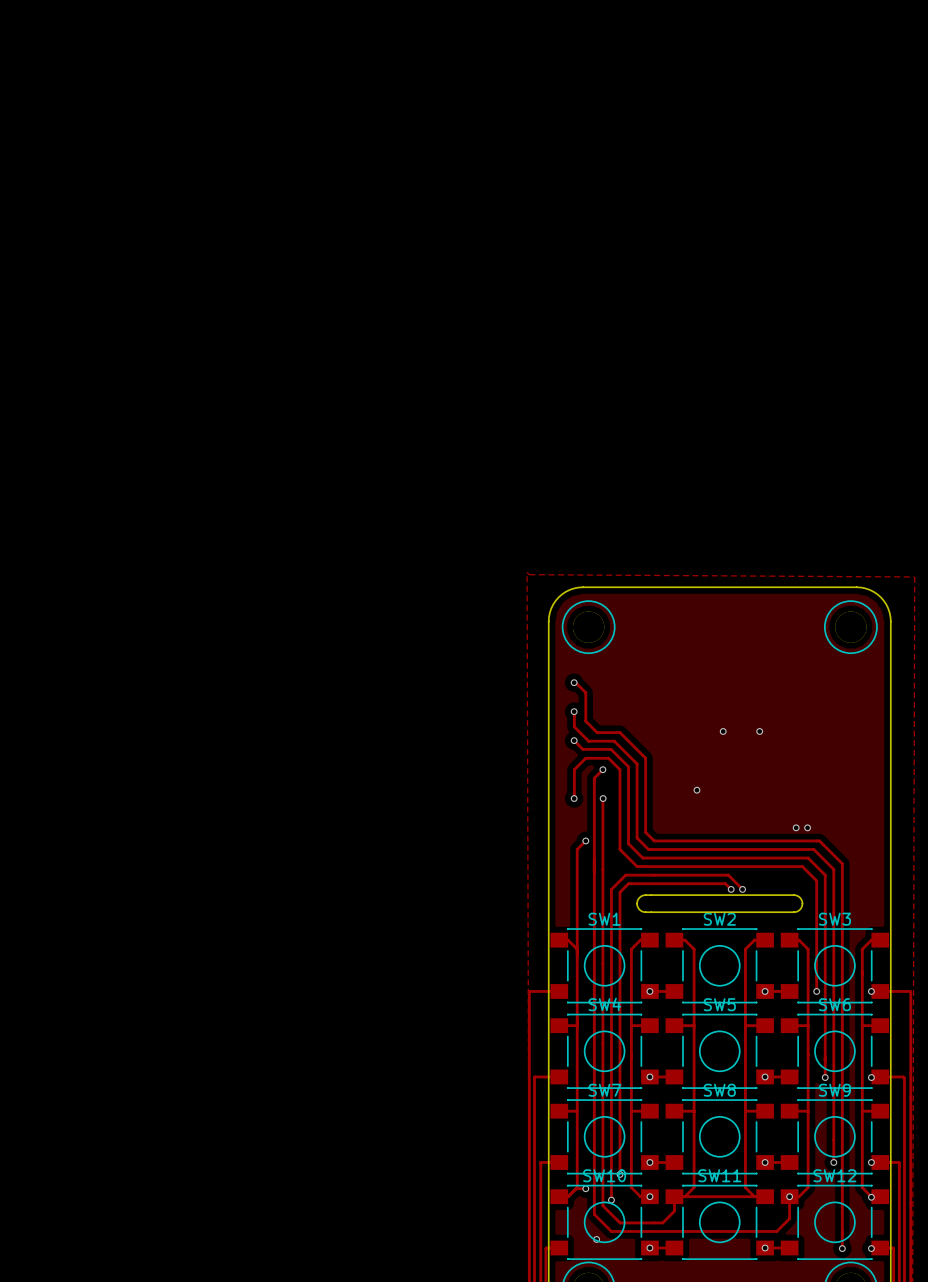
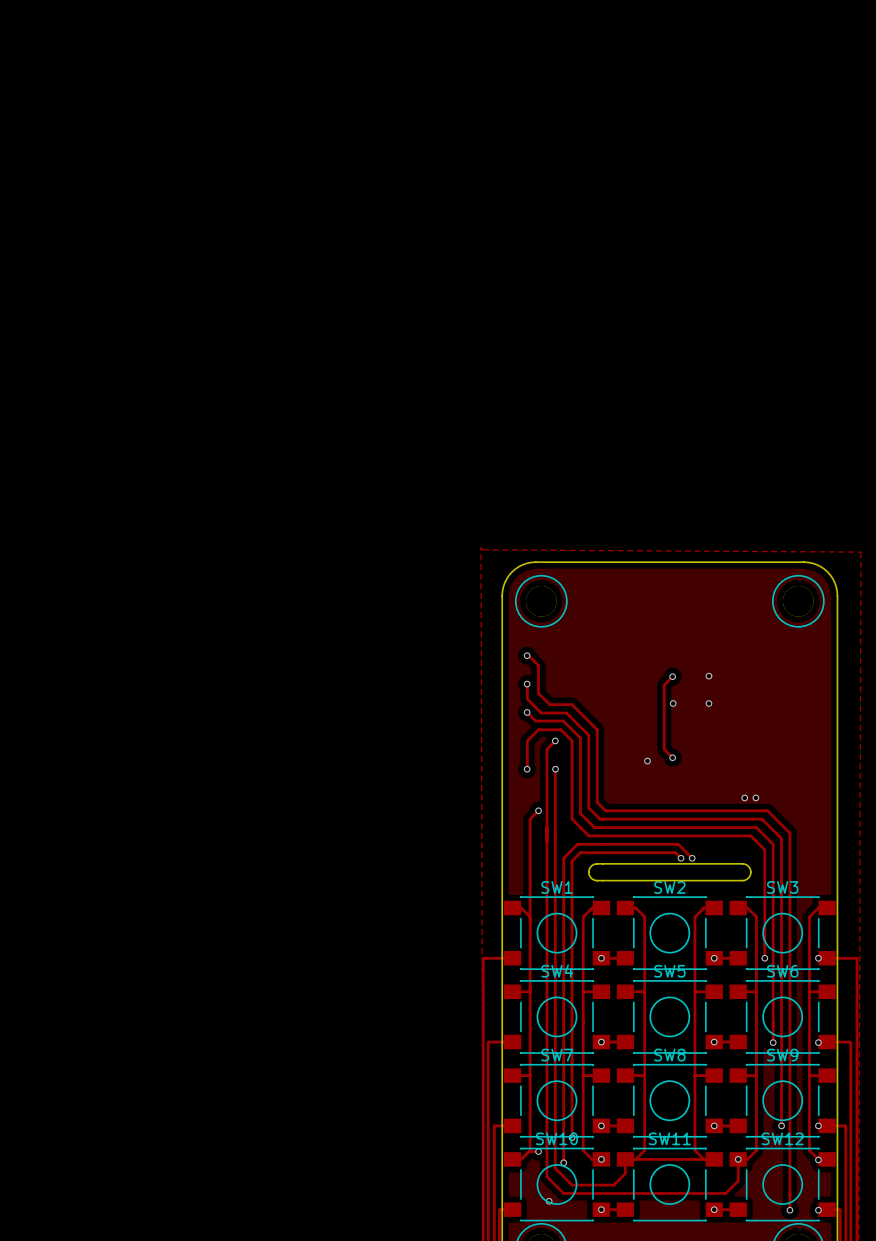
via: none -> (708, 676)
track: none -> (711, 676) (711, 676)
track: none -> (672, 676) (664, 685) (664, 749) (672, 757)
via: none -> (672, 676)
via: none -> (672, 757)

